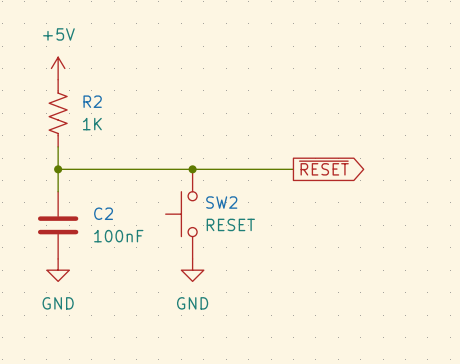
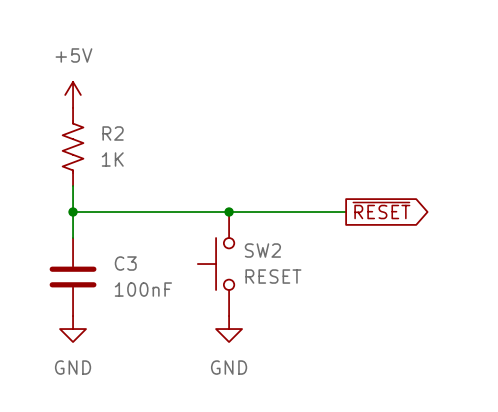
C2 name: C2 (103, 213) -> C3 (125, 263)

